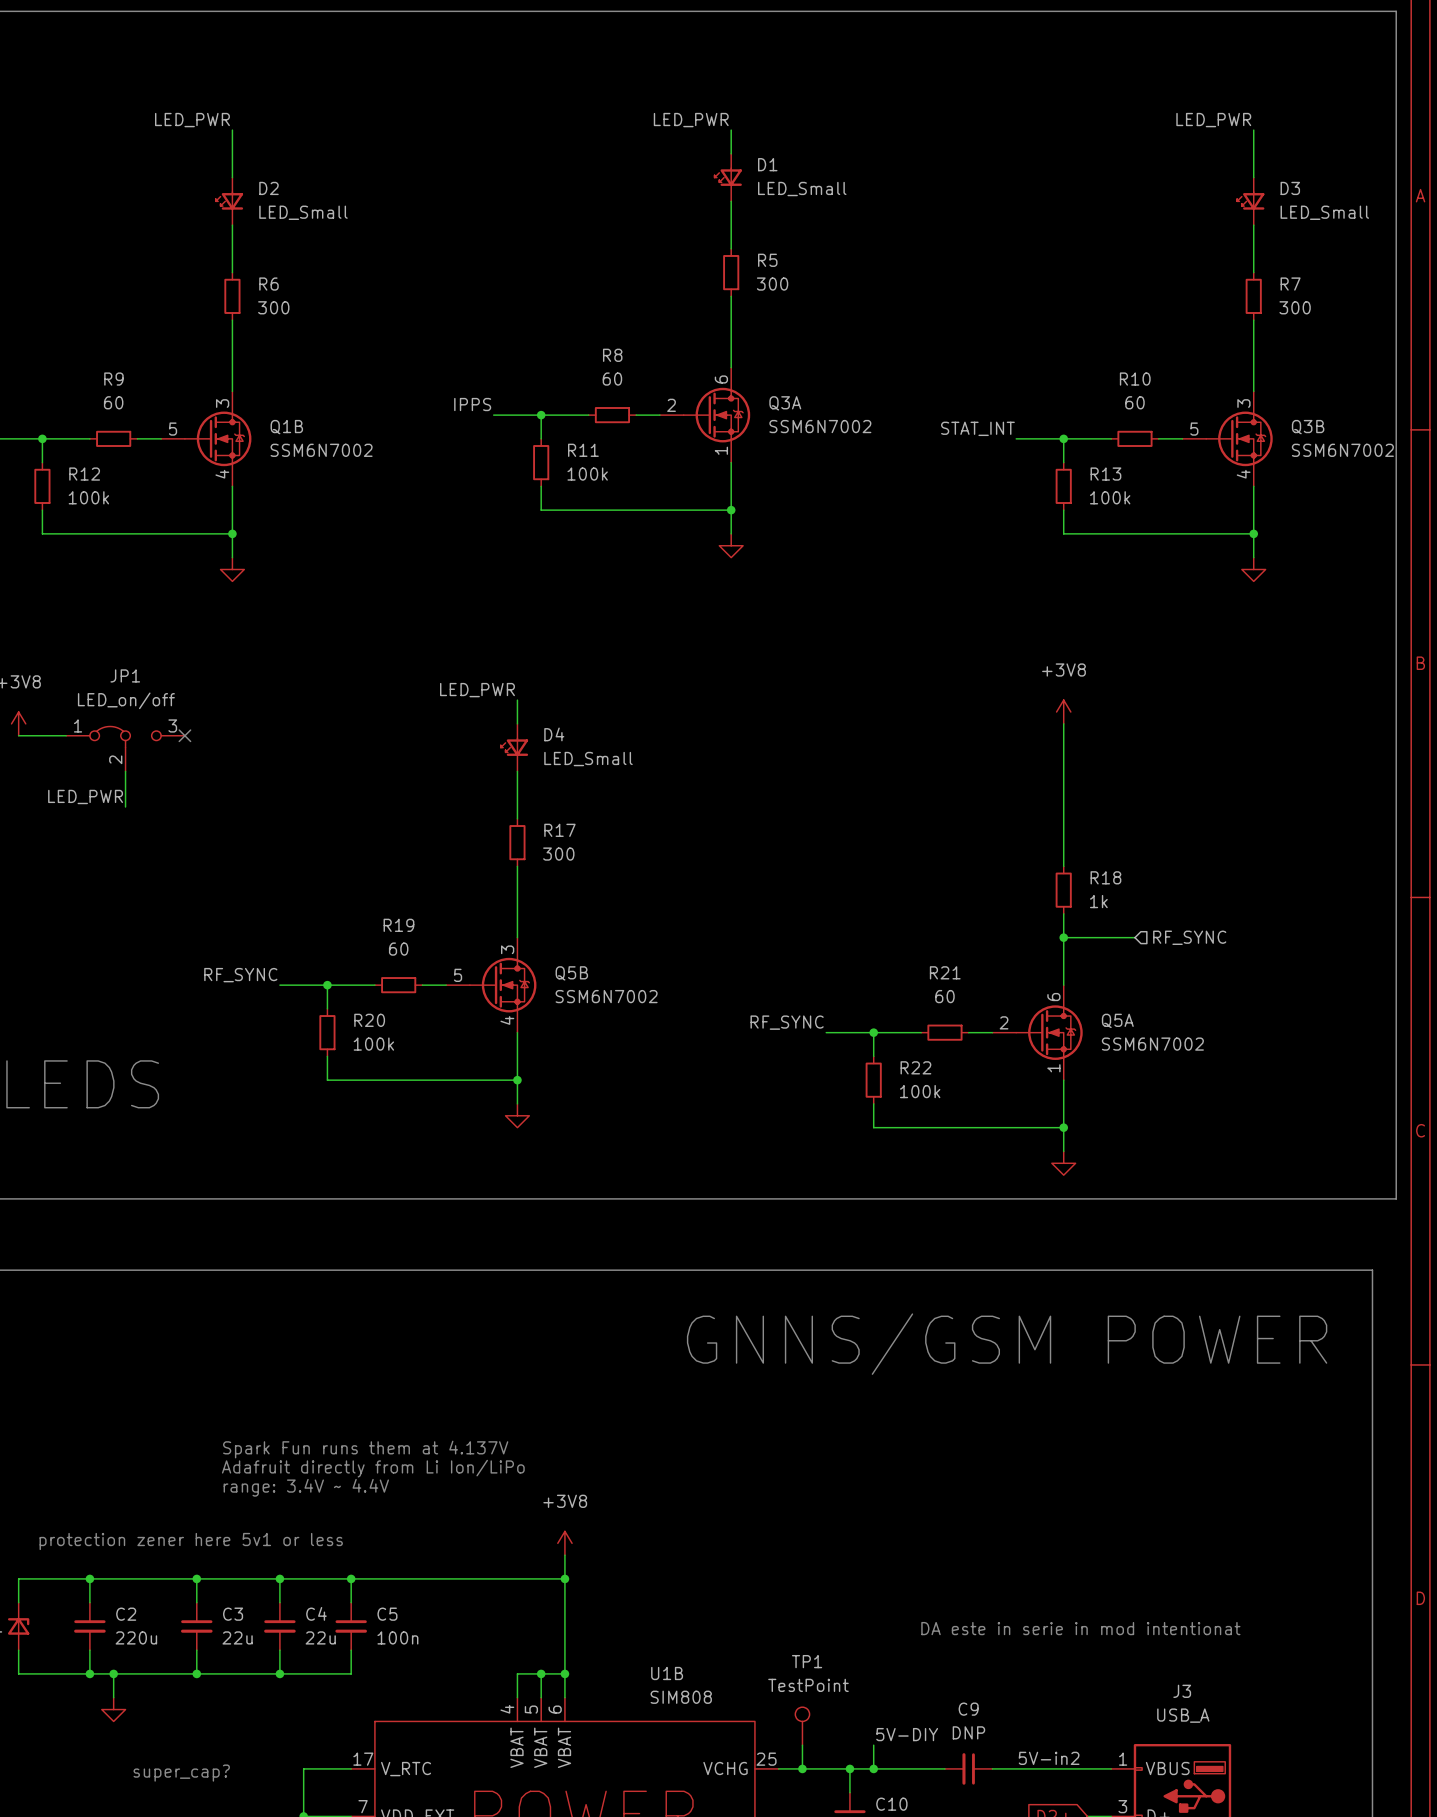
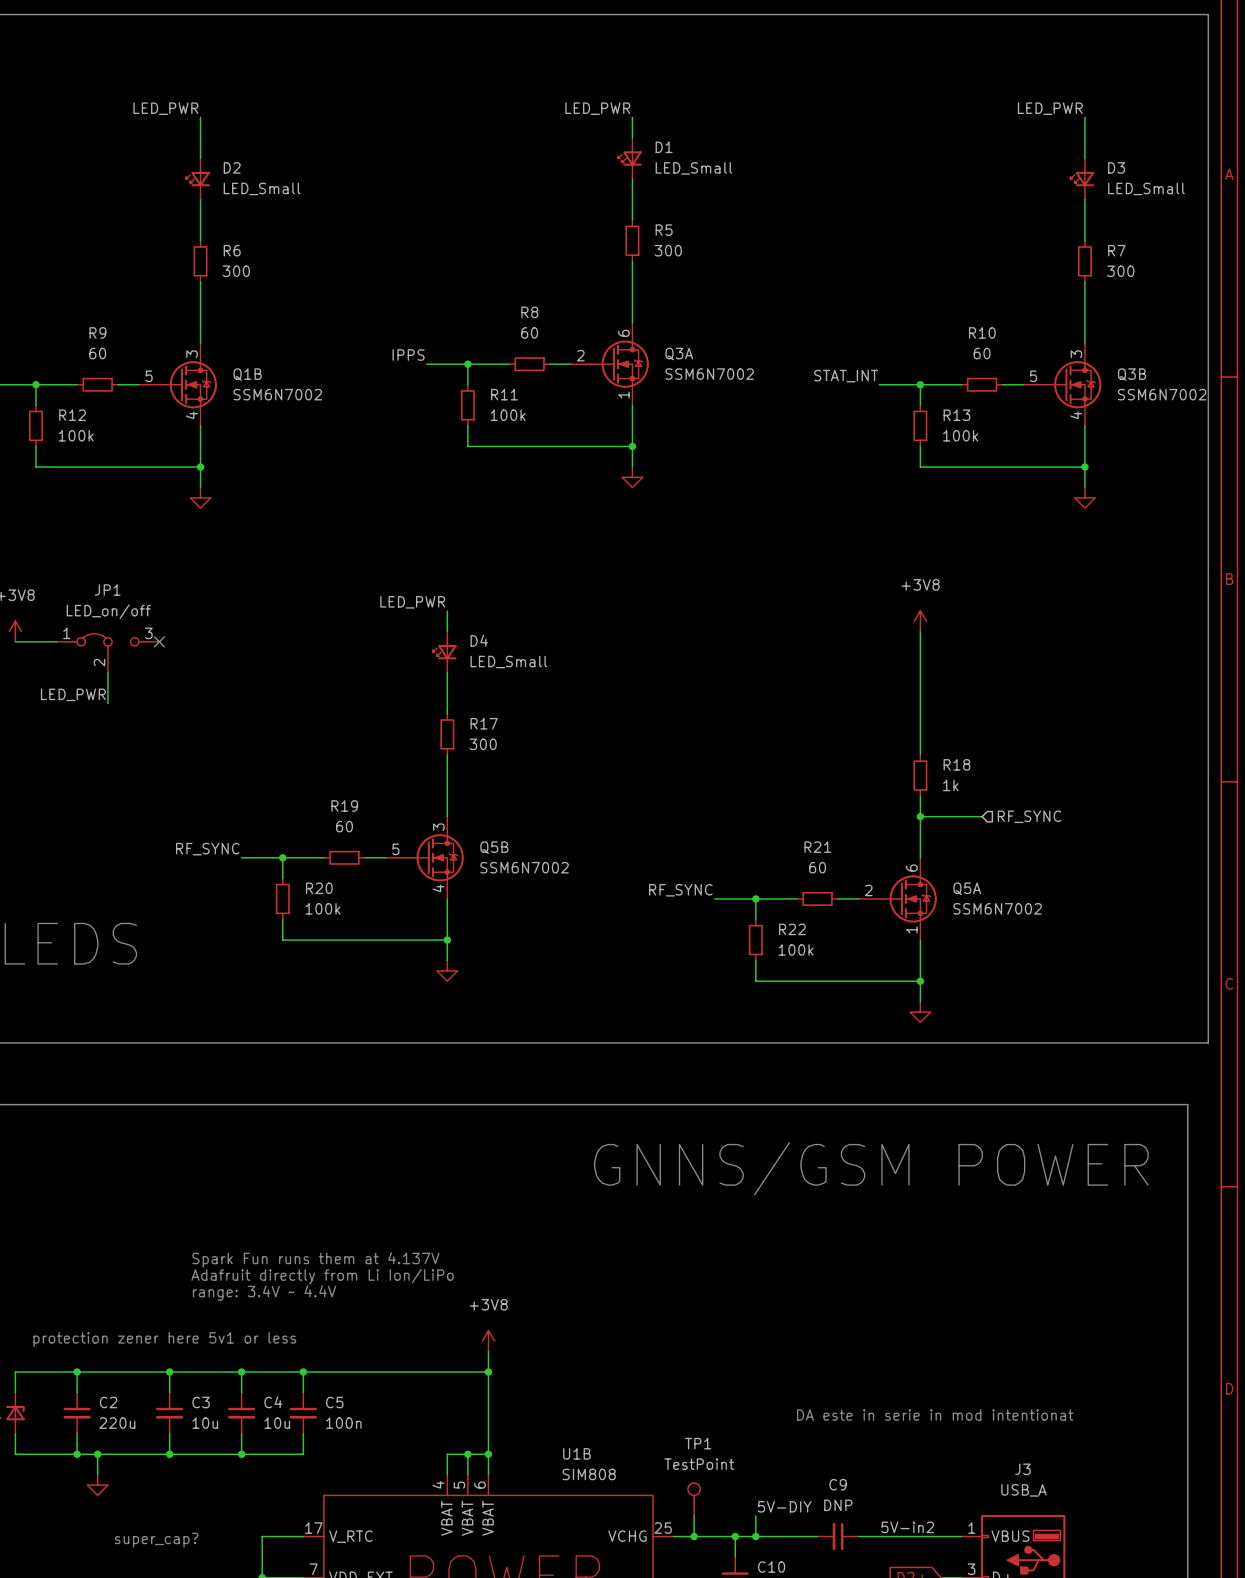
C3 value: 22u (237, 1637) -> 10u (205, 1423)
C4 value: 22u (320, 1637) -> 10u (277, 1423)

